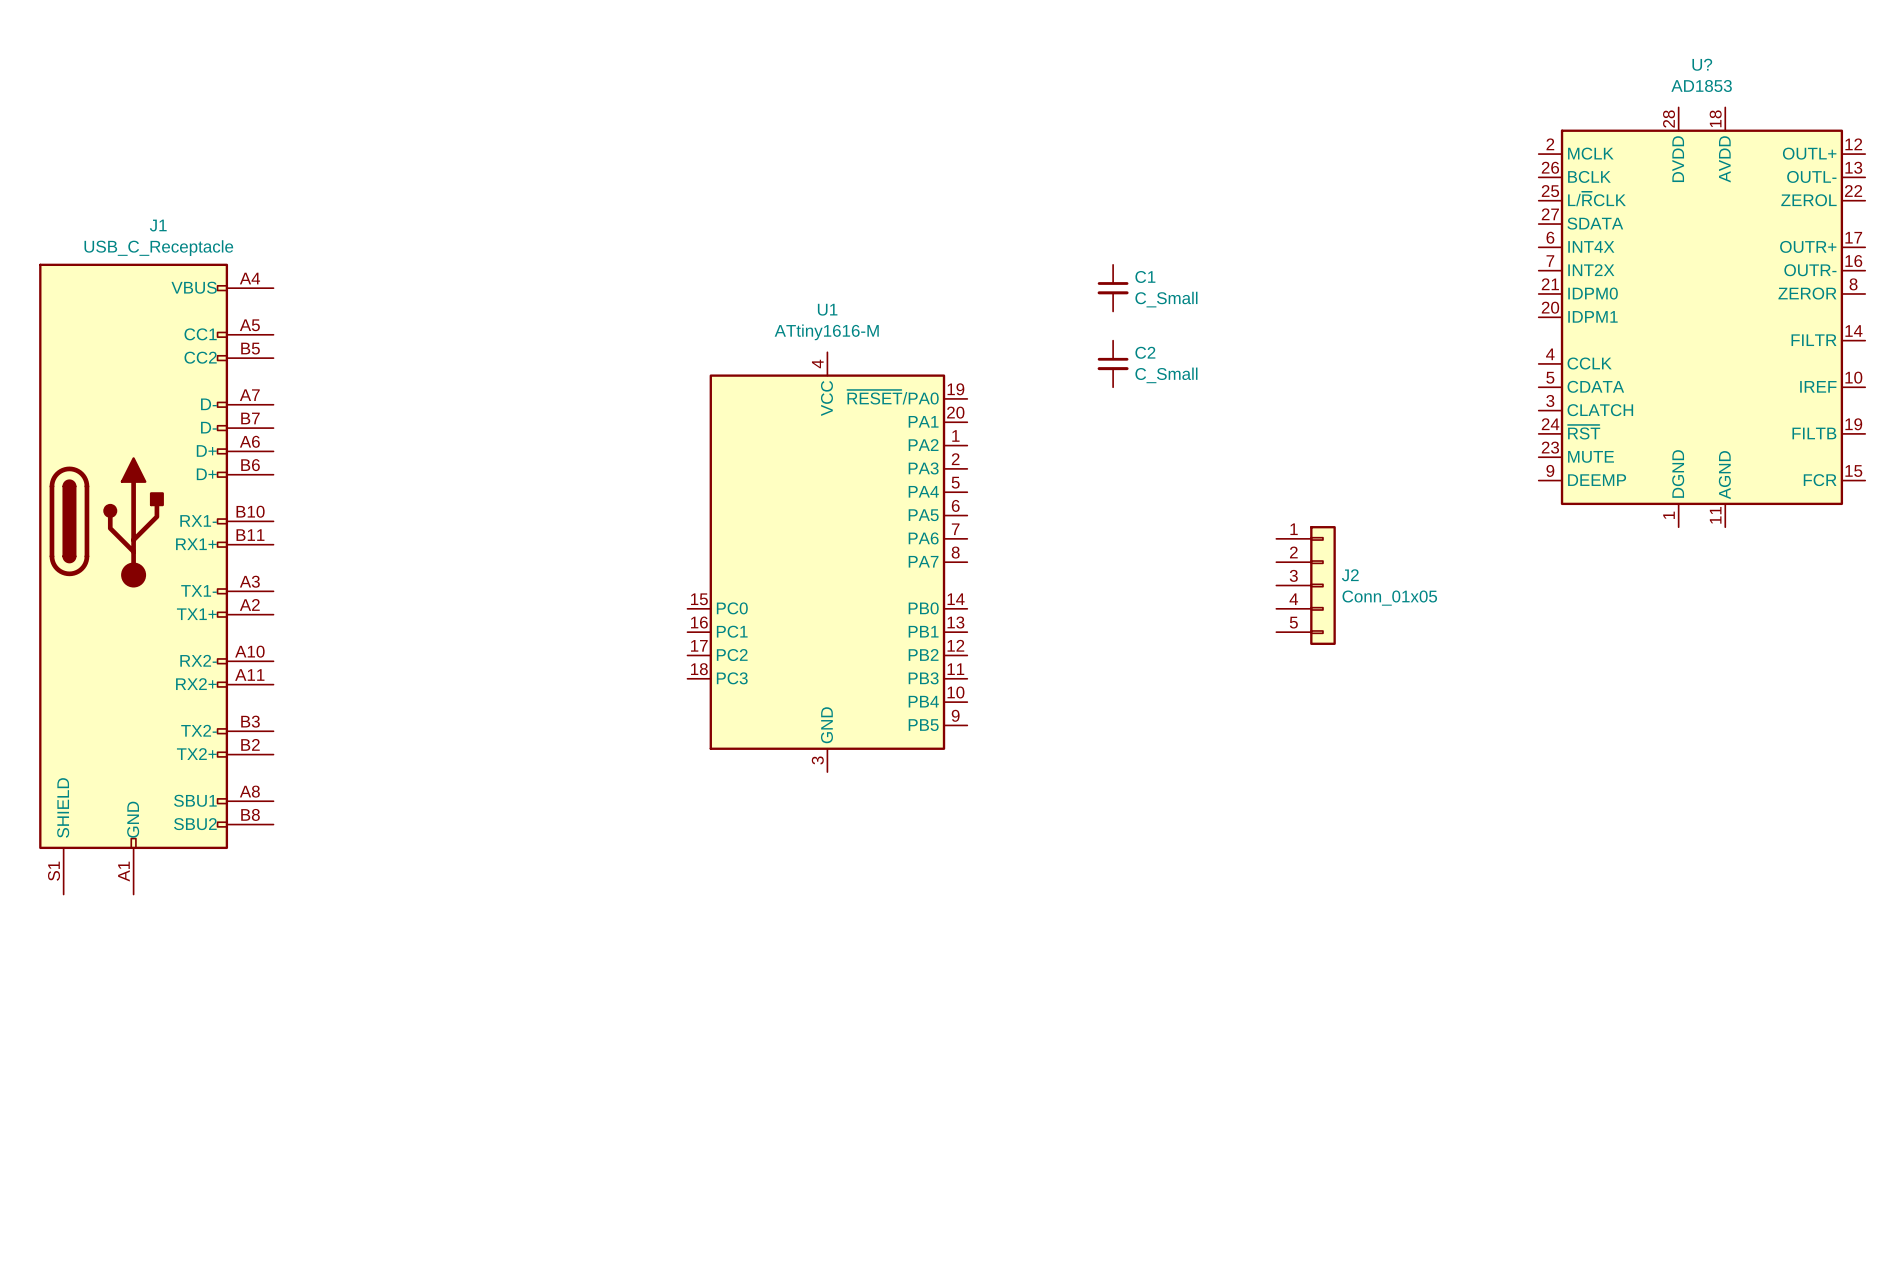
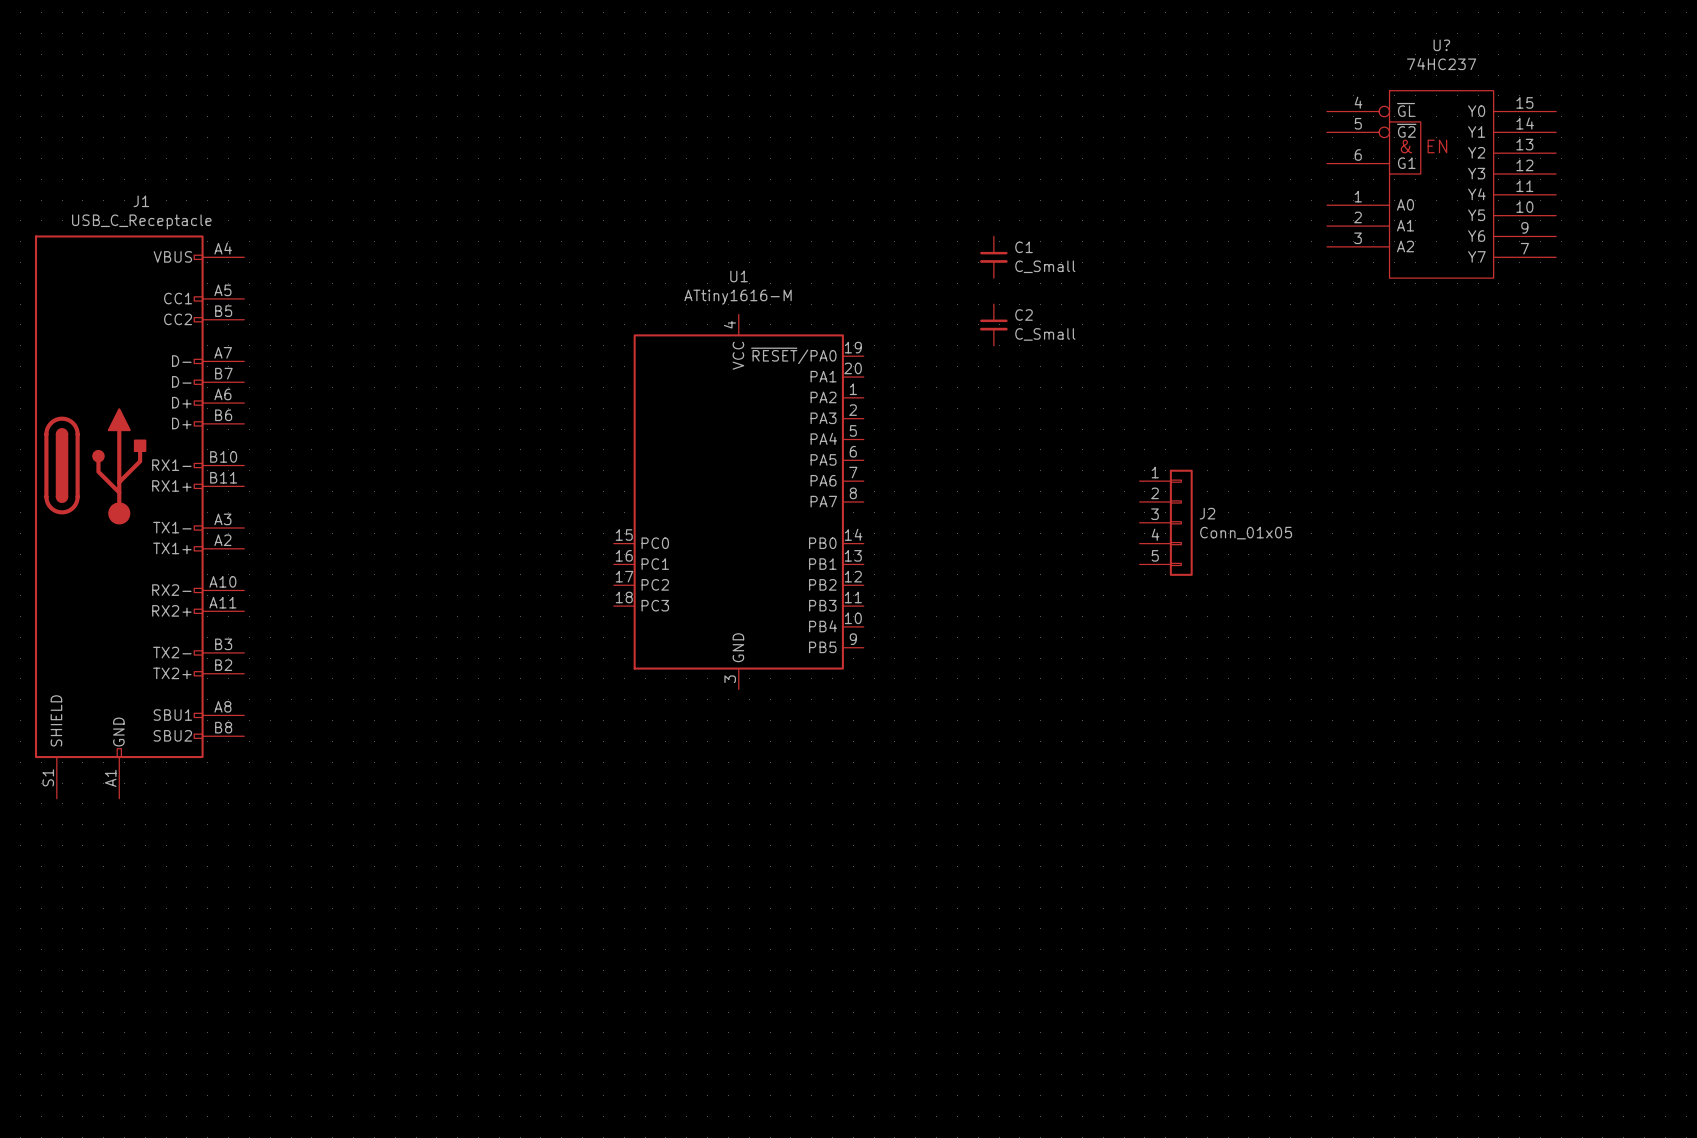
U?: none -> 74HC237 (1441, 184)
U?: AD1853 (1701, 317) -> none

